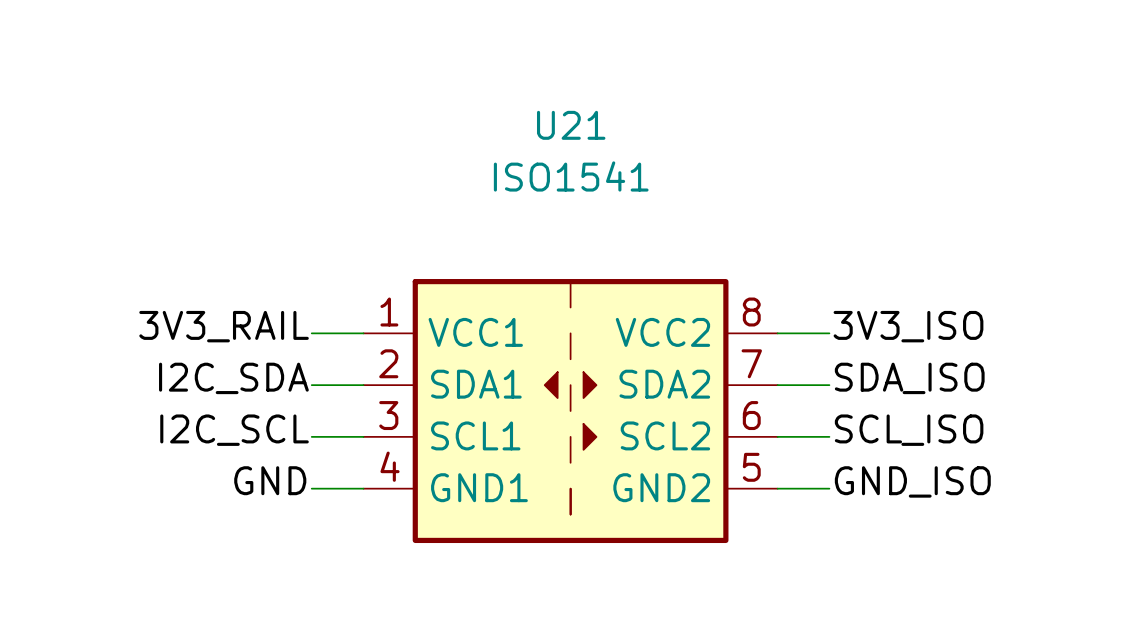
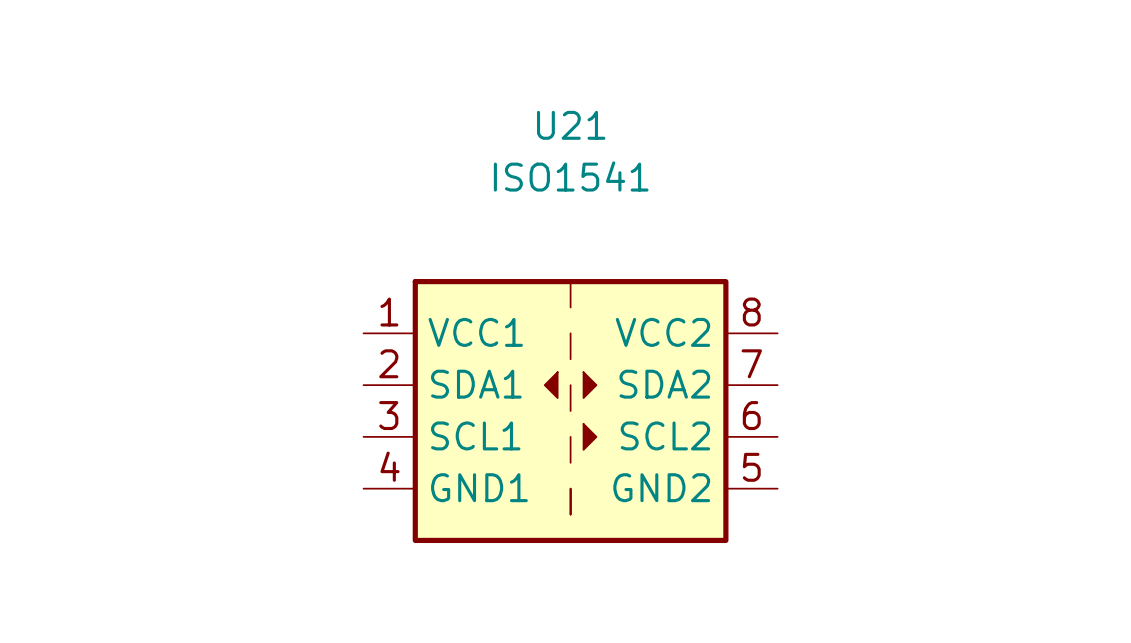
label: 3V3_RAIL (224, 326) -> none
label: 3V3_ISO (908, 326) -> none
wire: (311, 333) (363, 333) -> none
wire: (777, 333) (829, 333) -> none
label: I2C_SDA (233, 378) -> none
label: SDA_ISO (909, 378) -> none
wire: (311, 385) (363, 385) -> none
wire: (777, 385) (829, 385) -> none
label: I2C_SCL (234, 430) -> none
label: SCL_ISO (909, 430) -> none
wire: (311, 436) (363, 436) -> none
wire: (777, 436) (829, 436) -> none
label: GND (270, 480) -> none
label: GND_ISO (912, 481) -> none
wire: (311, 488) (363, 488) -> none
wire: (777, 488) (829, 488) -> none

